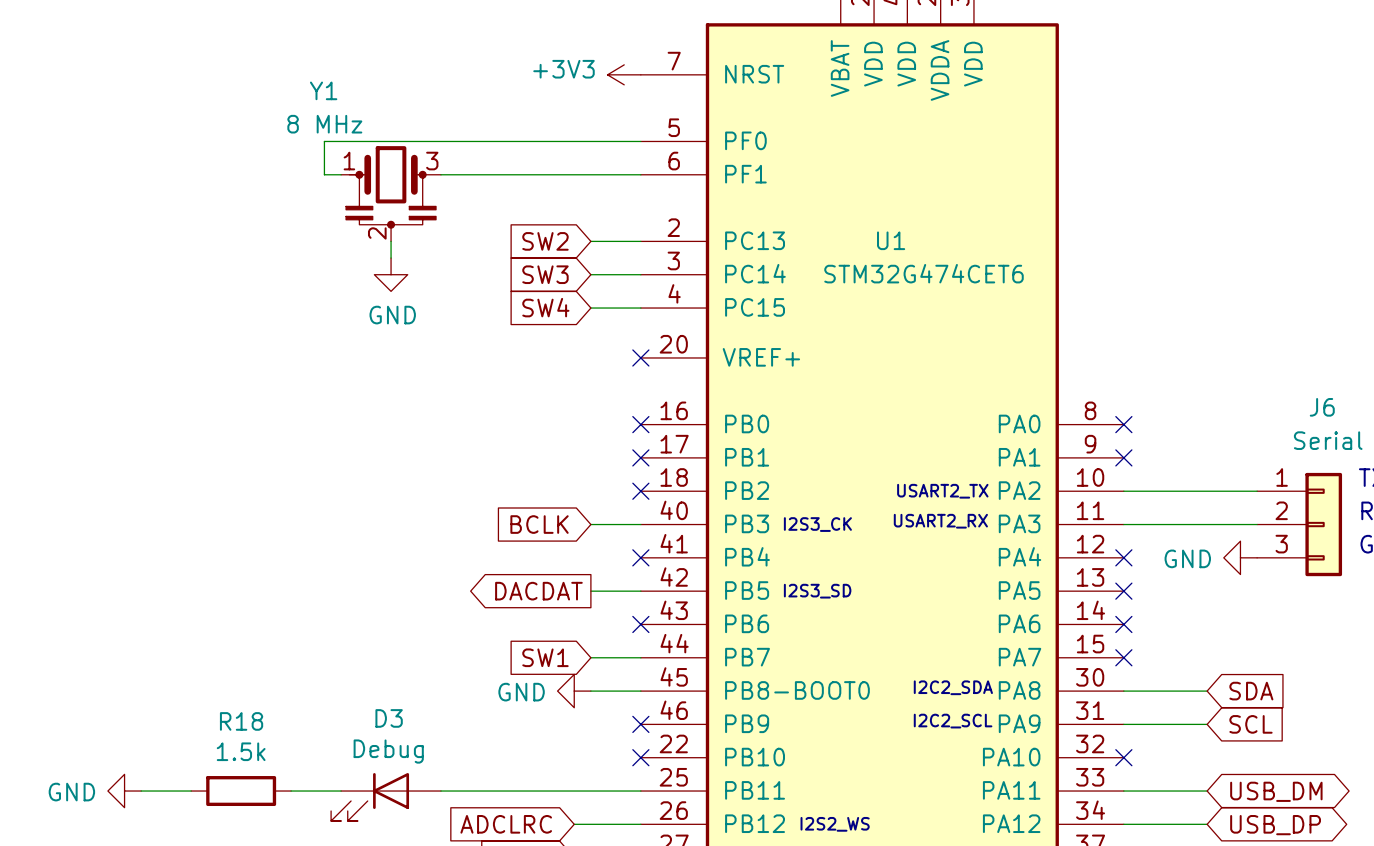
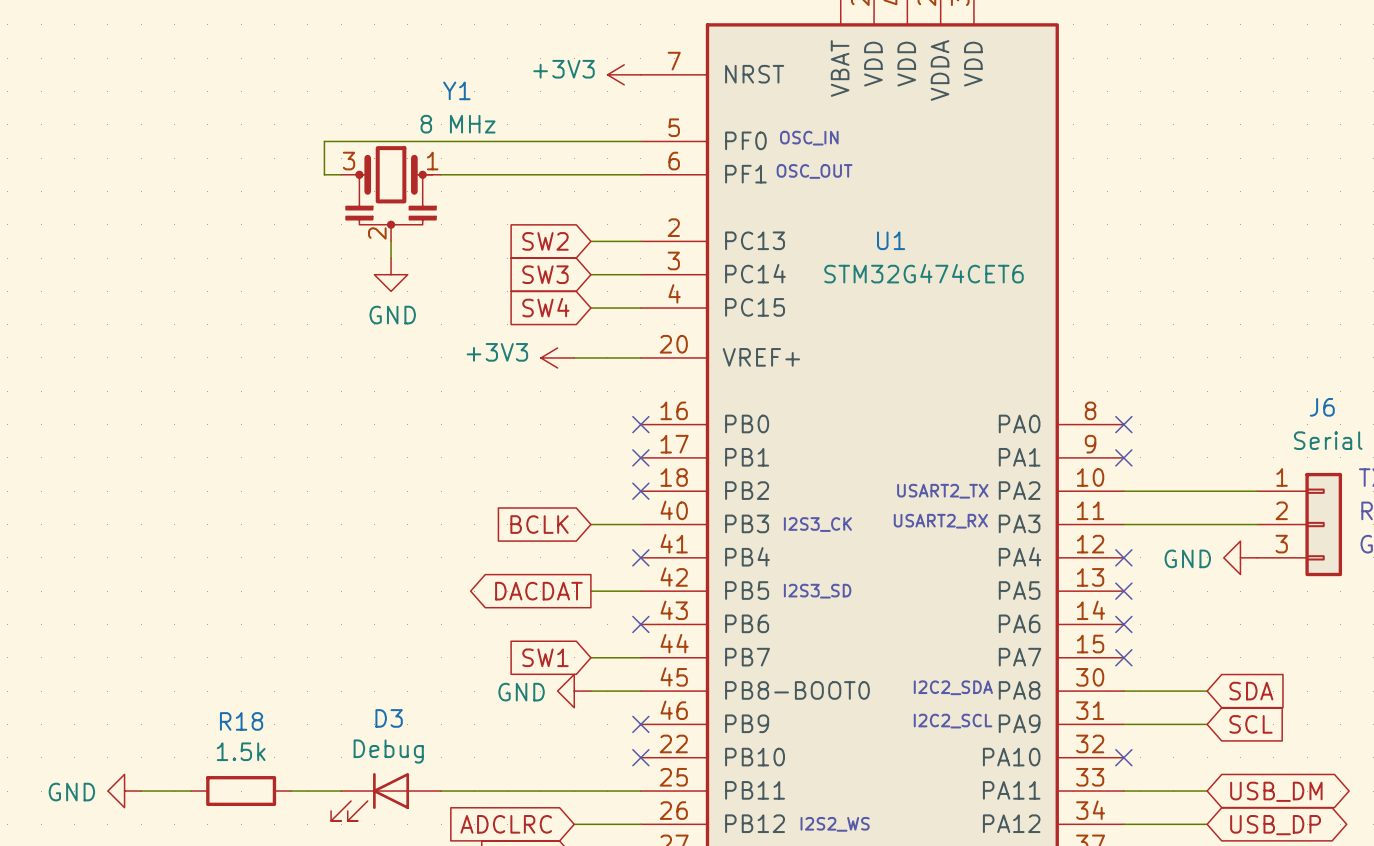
text: none -> OSC_IN (809, 138)
text: none -> OSC_OUT (814, 171)
Y1 flip: as is (391, 187) -> left-right (391, 187)
power symbol: none -> +3V3 (557, 357)
wire: none -> (574, 357) (640, 357)
no-connect mark: (640, 357) -> none

